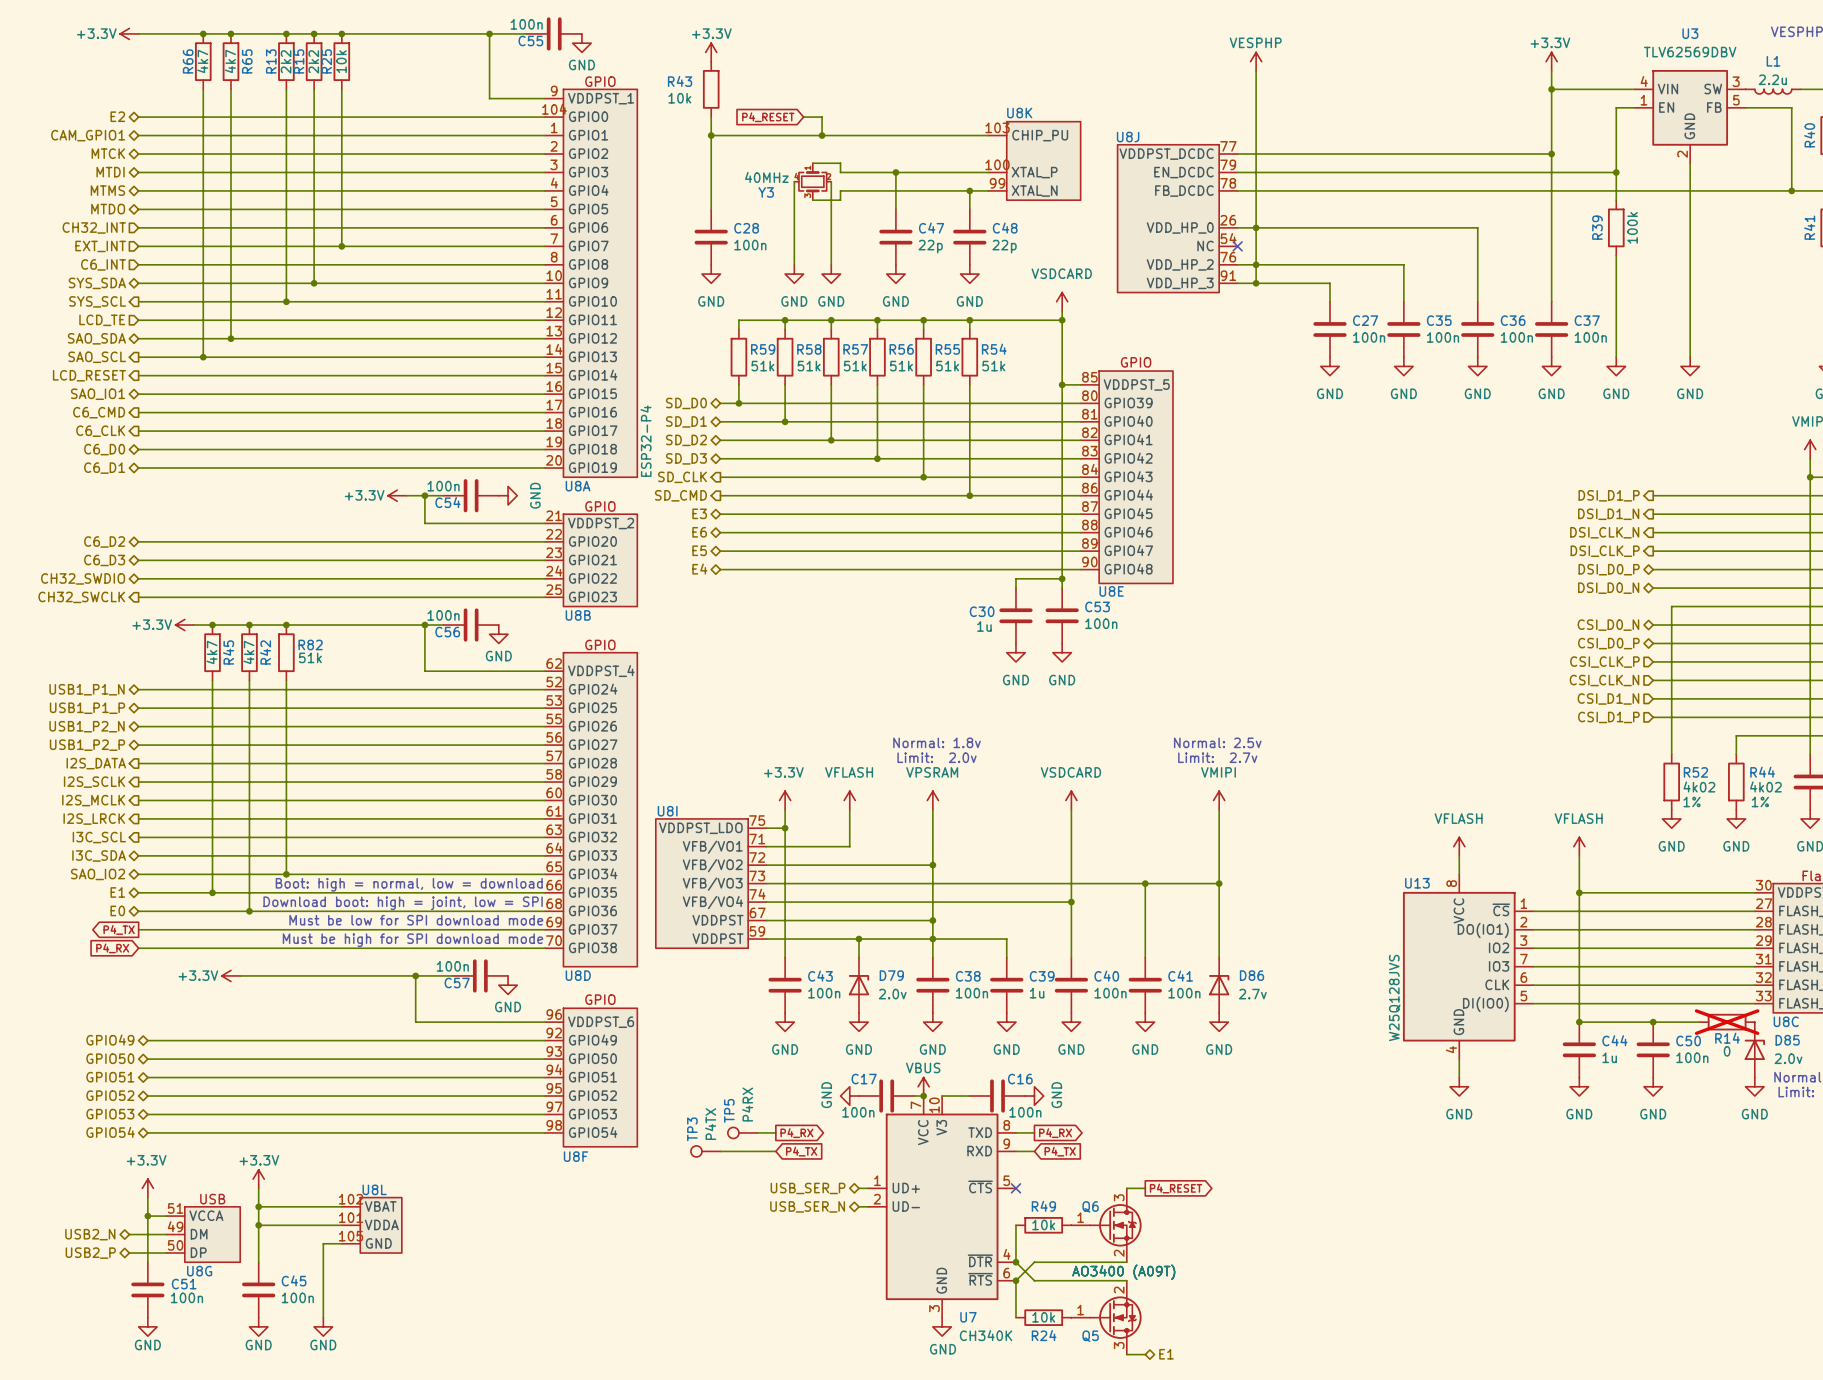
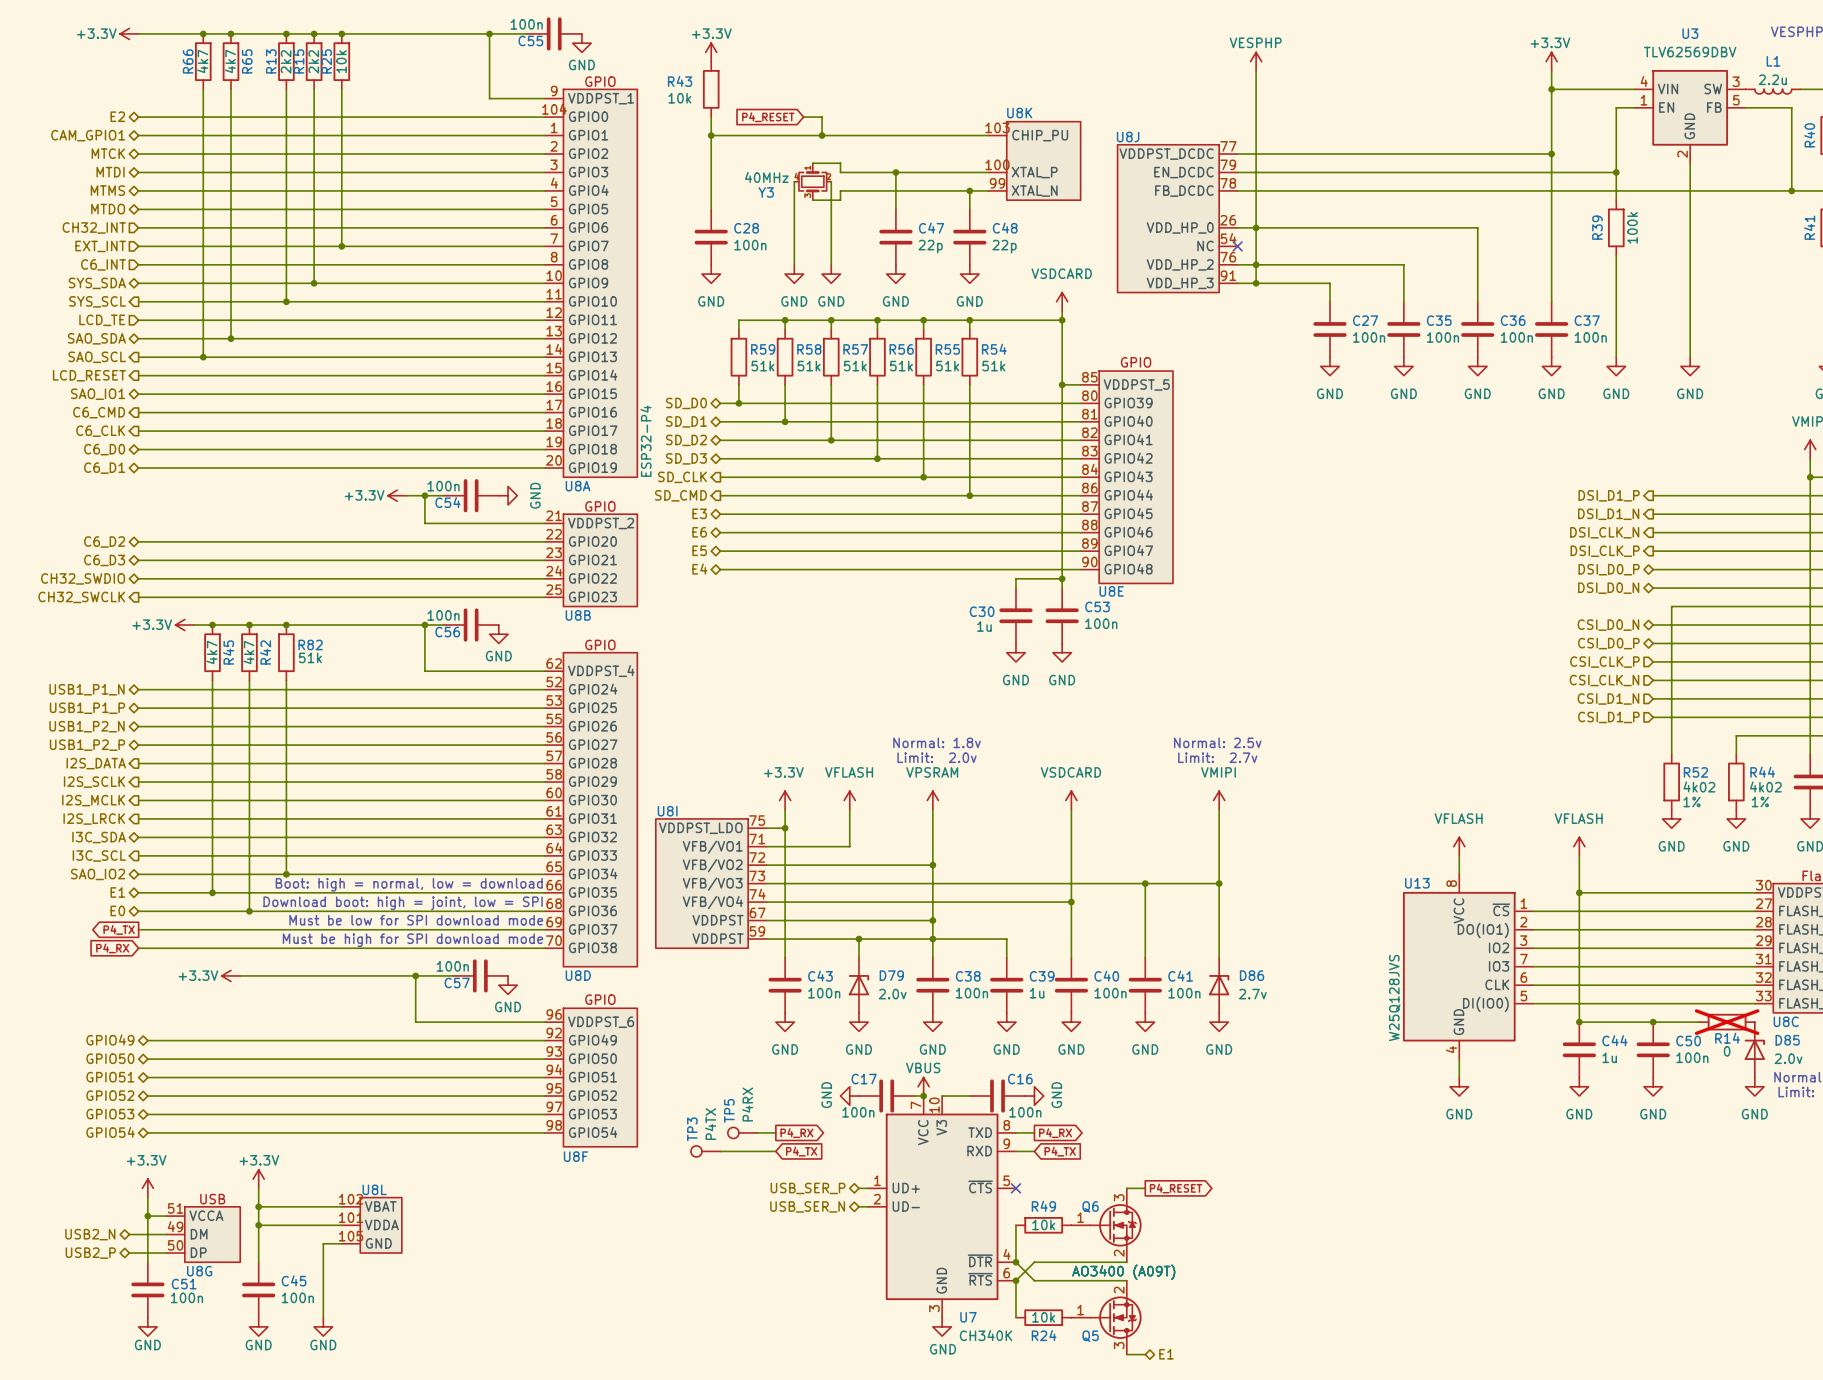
hierarchical label shape: output (99, 837) -> bidirectional (99, 837)
hierarchical label: I3C_SCL (99, 837) -> I3C_SDA (99, 837)
hierarchical label shape: bidirectional (99, 855) -> output (99, 855)
hierarchical label: I3C_SDA (99, 855) -> I3C_SCL (99, 855)

